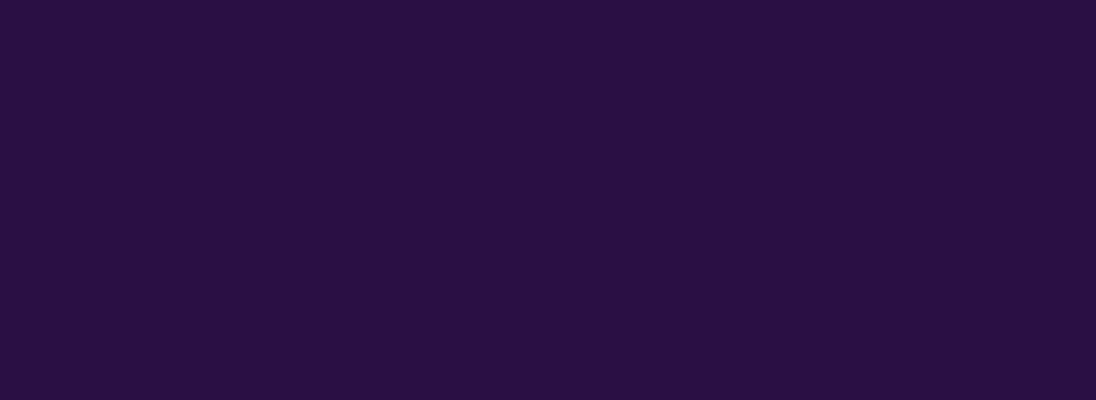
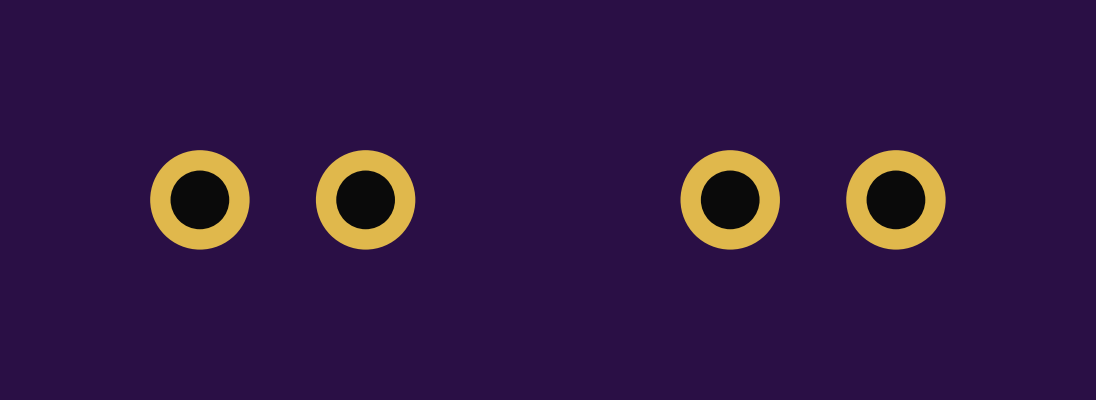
part: none -> (282, 199)
part: none -> (813, 199)

